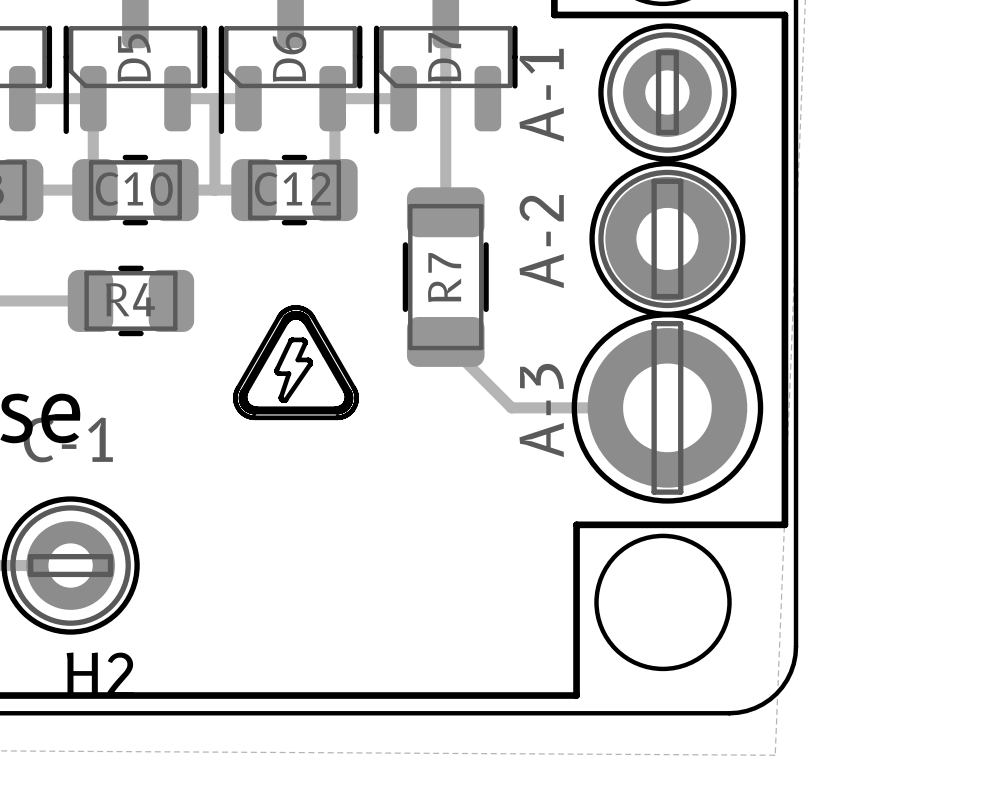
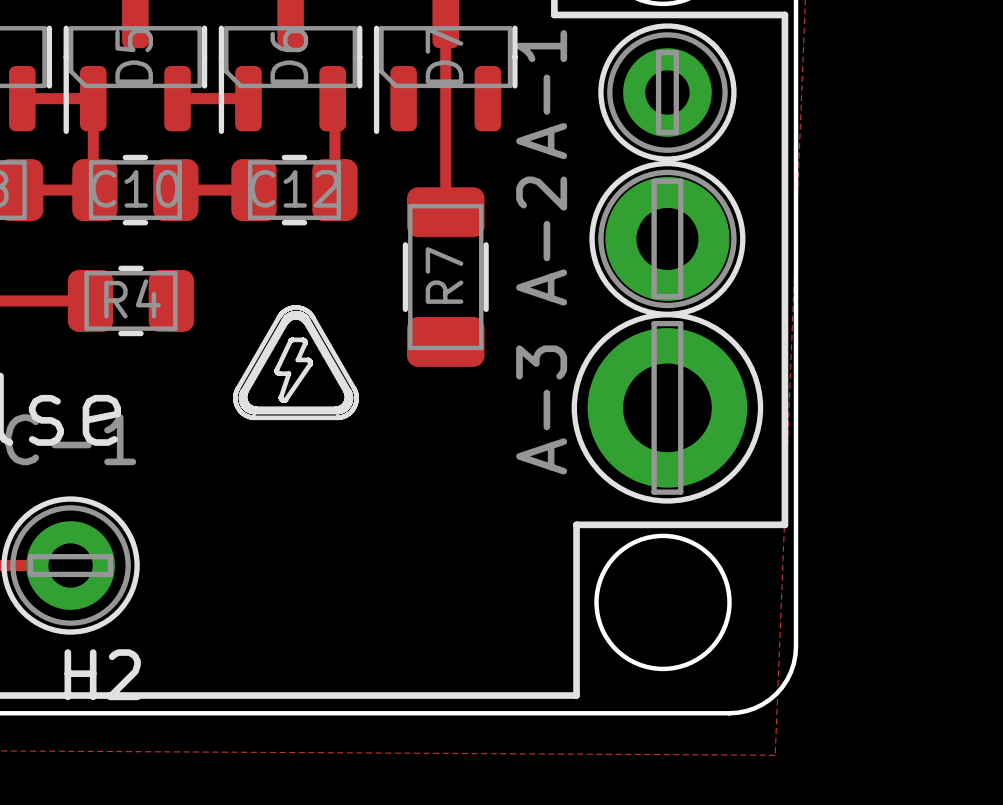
track: (214, 98) (214, 190) -> none
track: (332, 98) (403, 98) -> none
track: (445, 341) (511, 407) (667, 407) -> none

